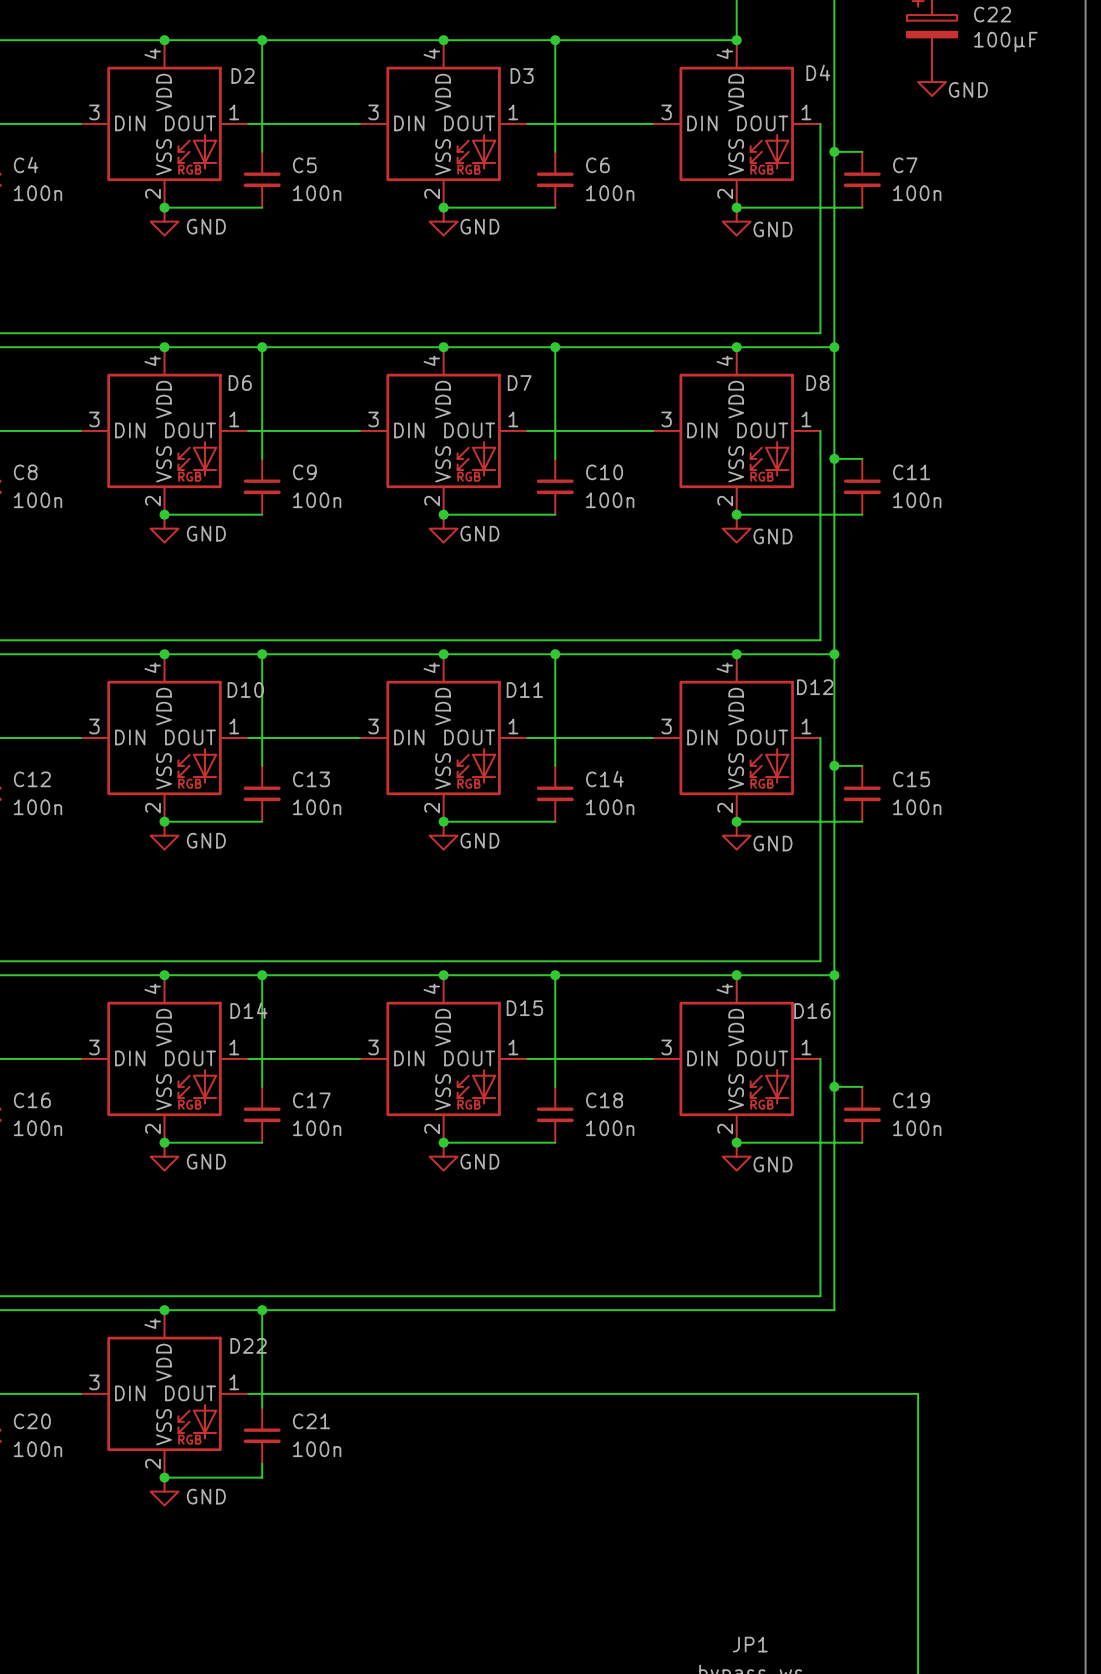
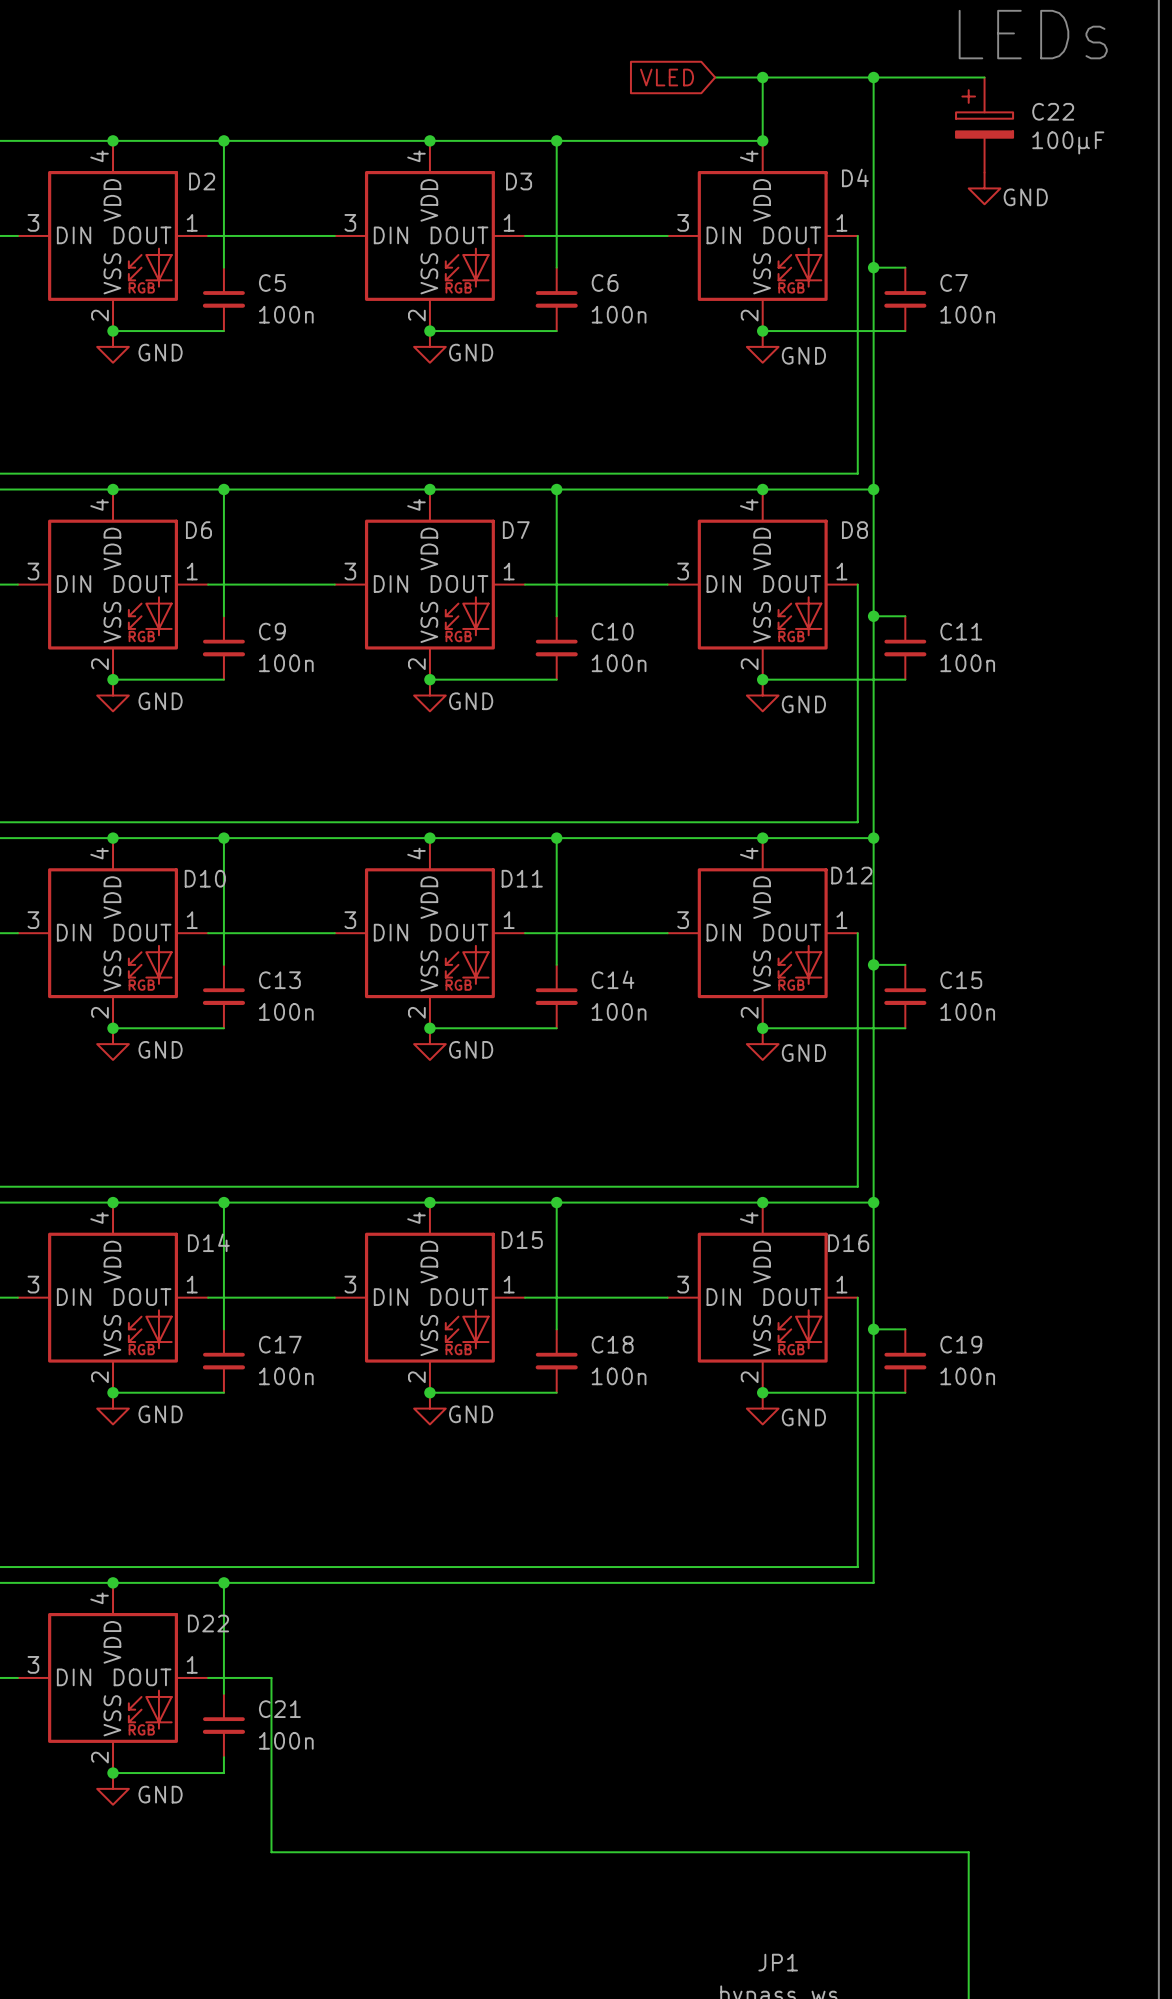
wire: (304, 1393) (918, 1393) (918, 1547) -> (271, 1677) (271, 1852) (968, 1852)

